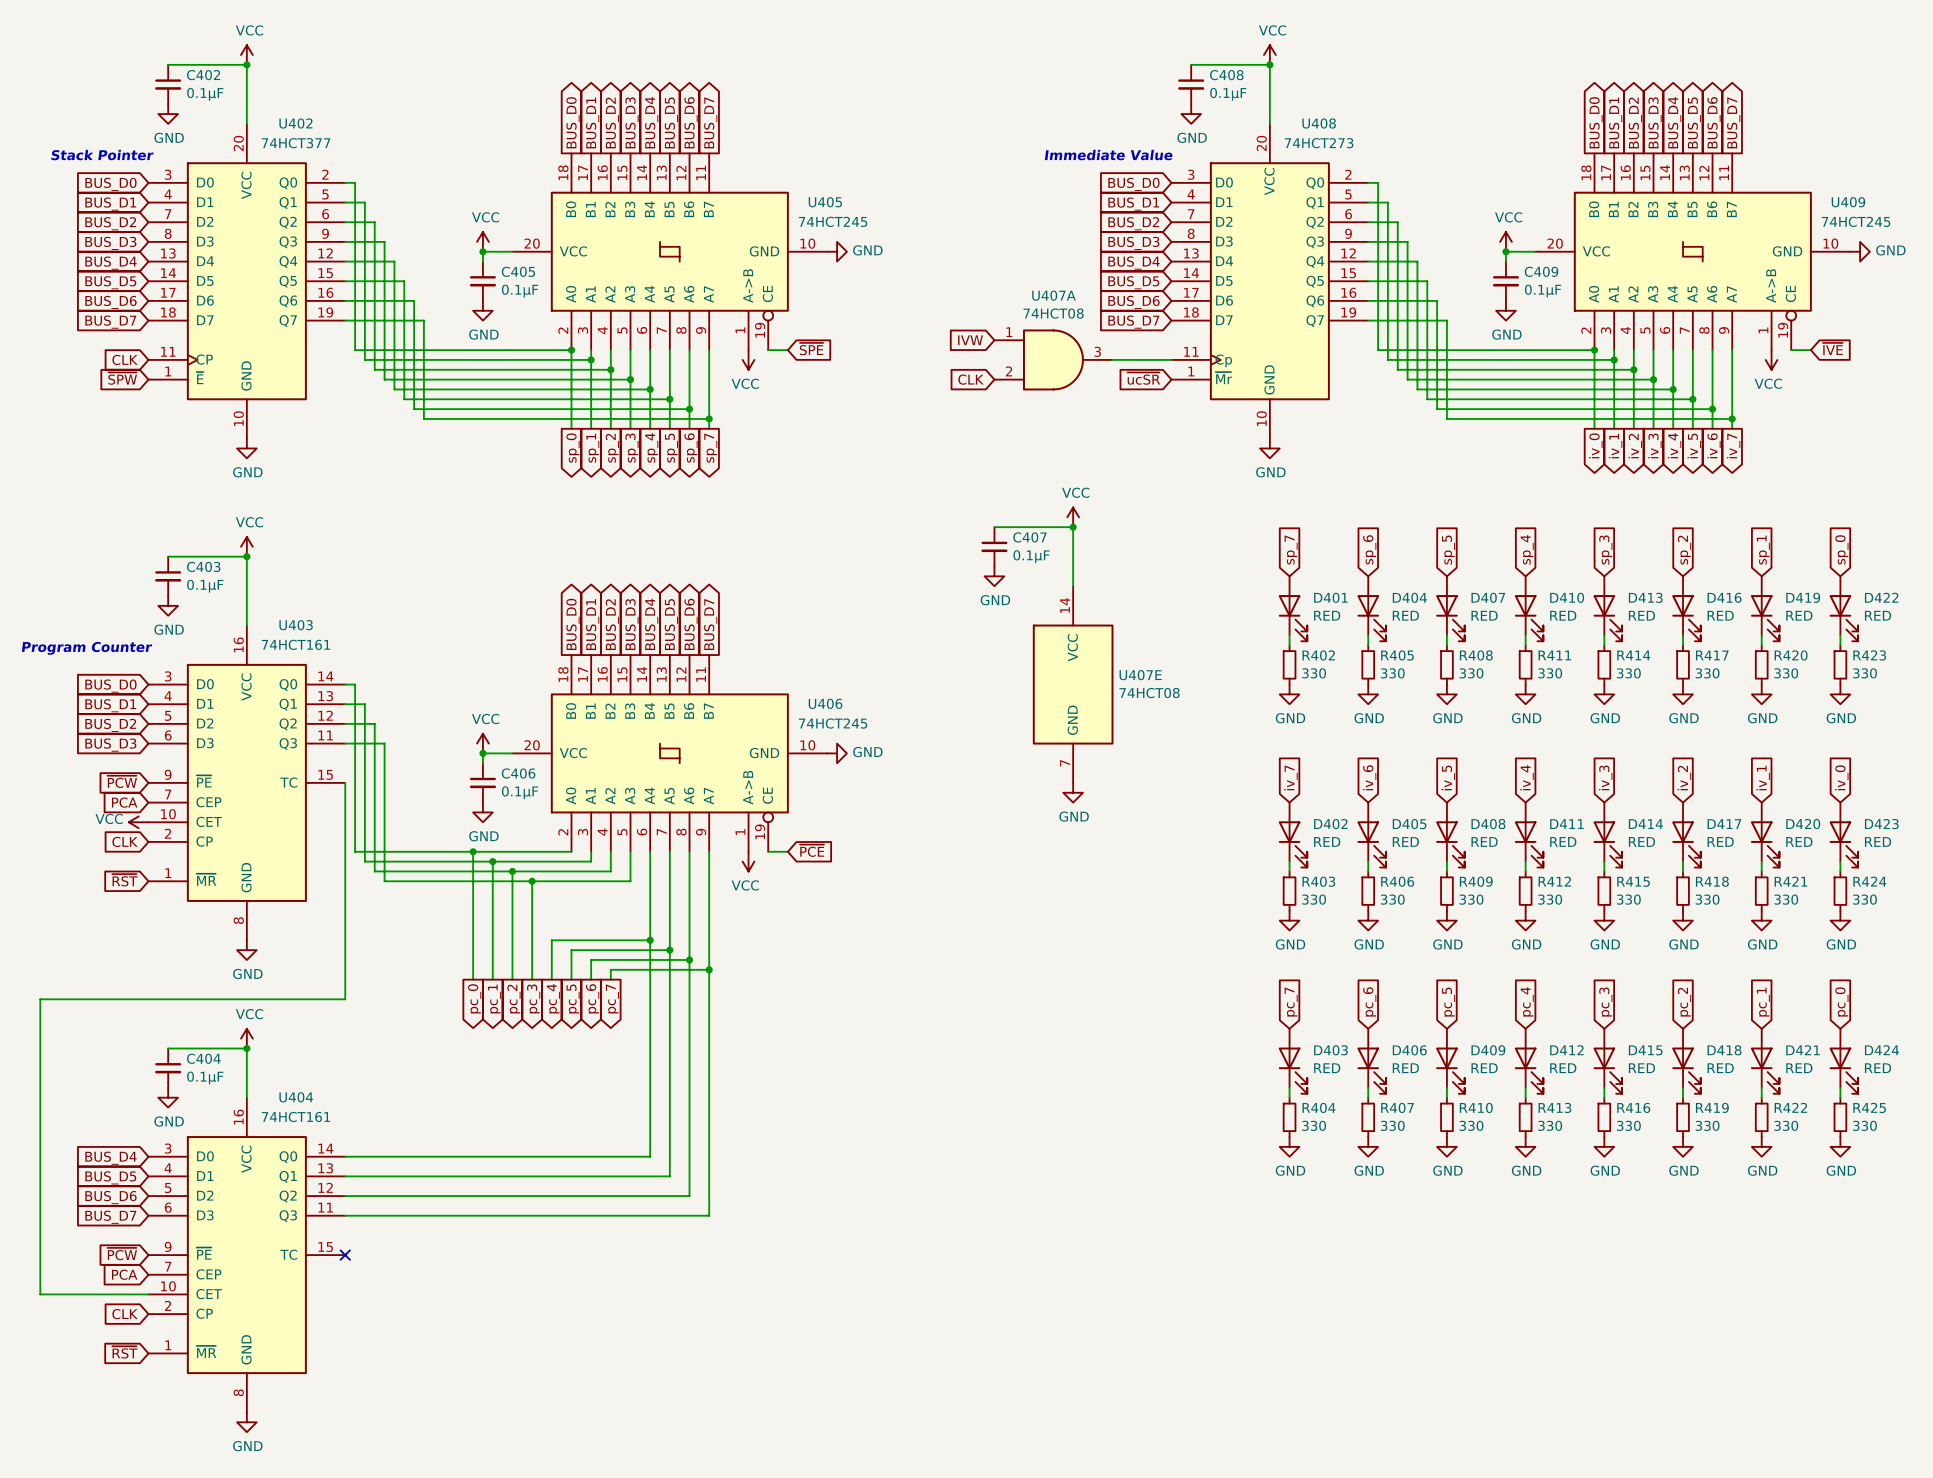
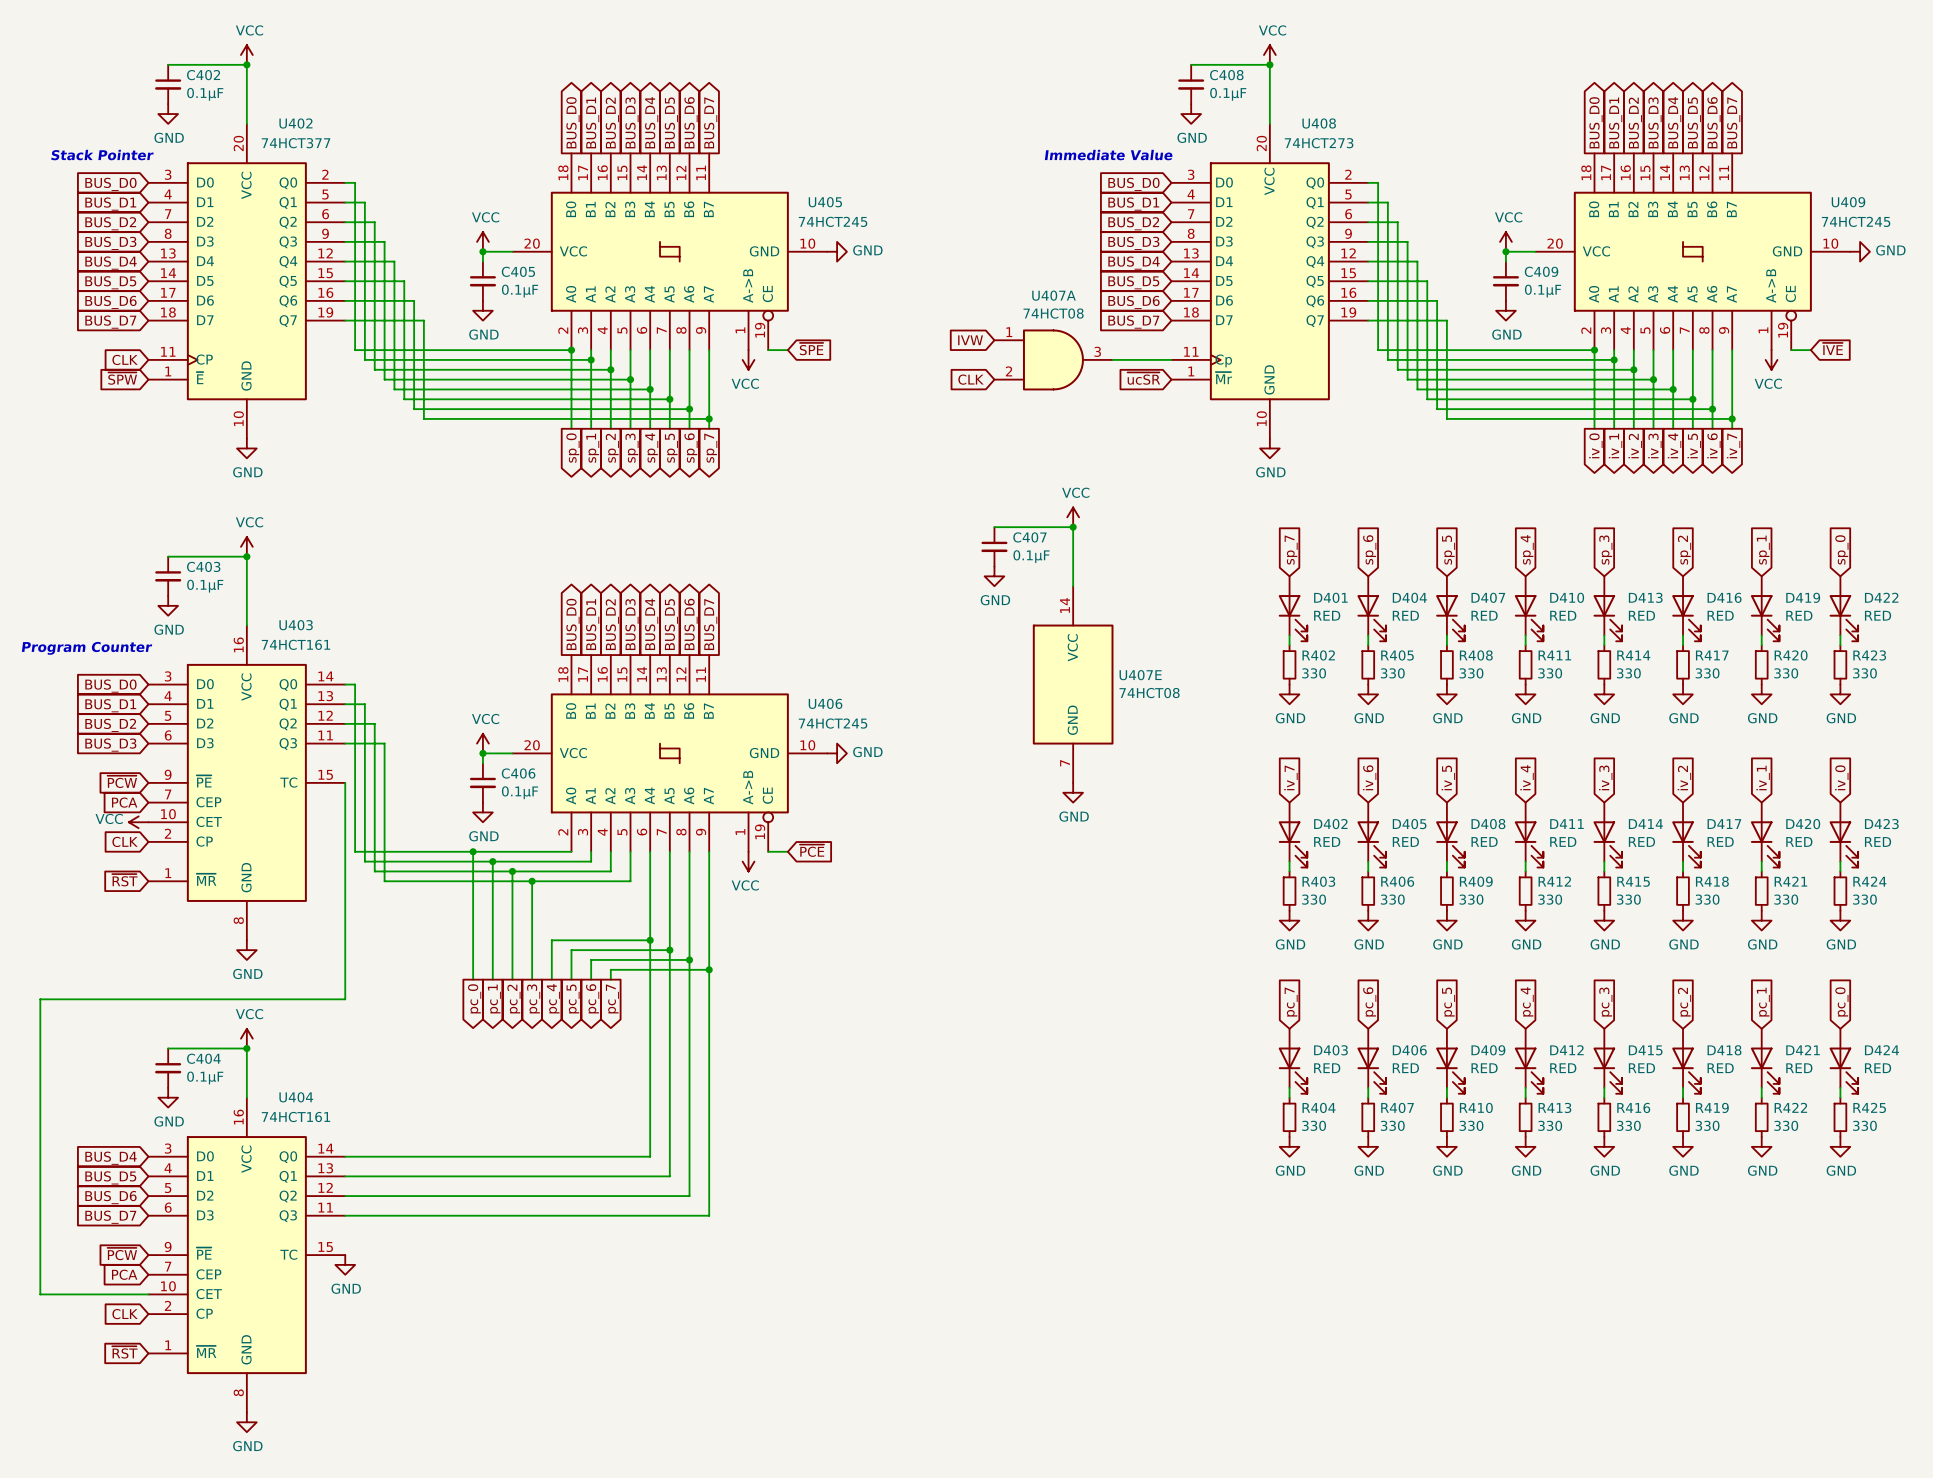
no-connect mark: (345, 1255) -> none
power symbol: none -> GND (345, 1264)

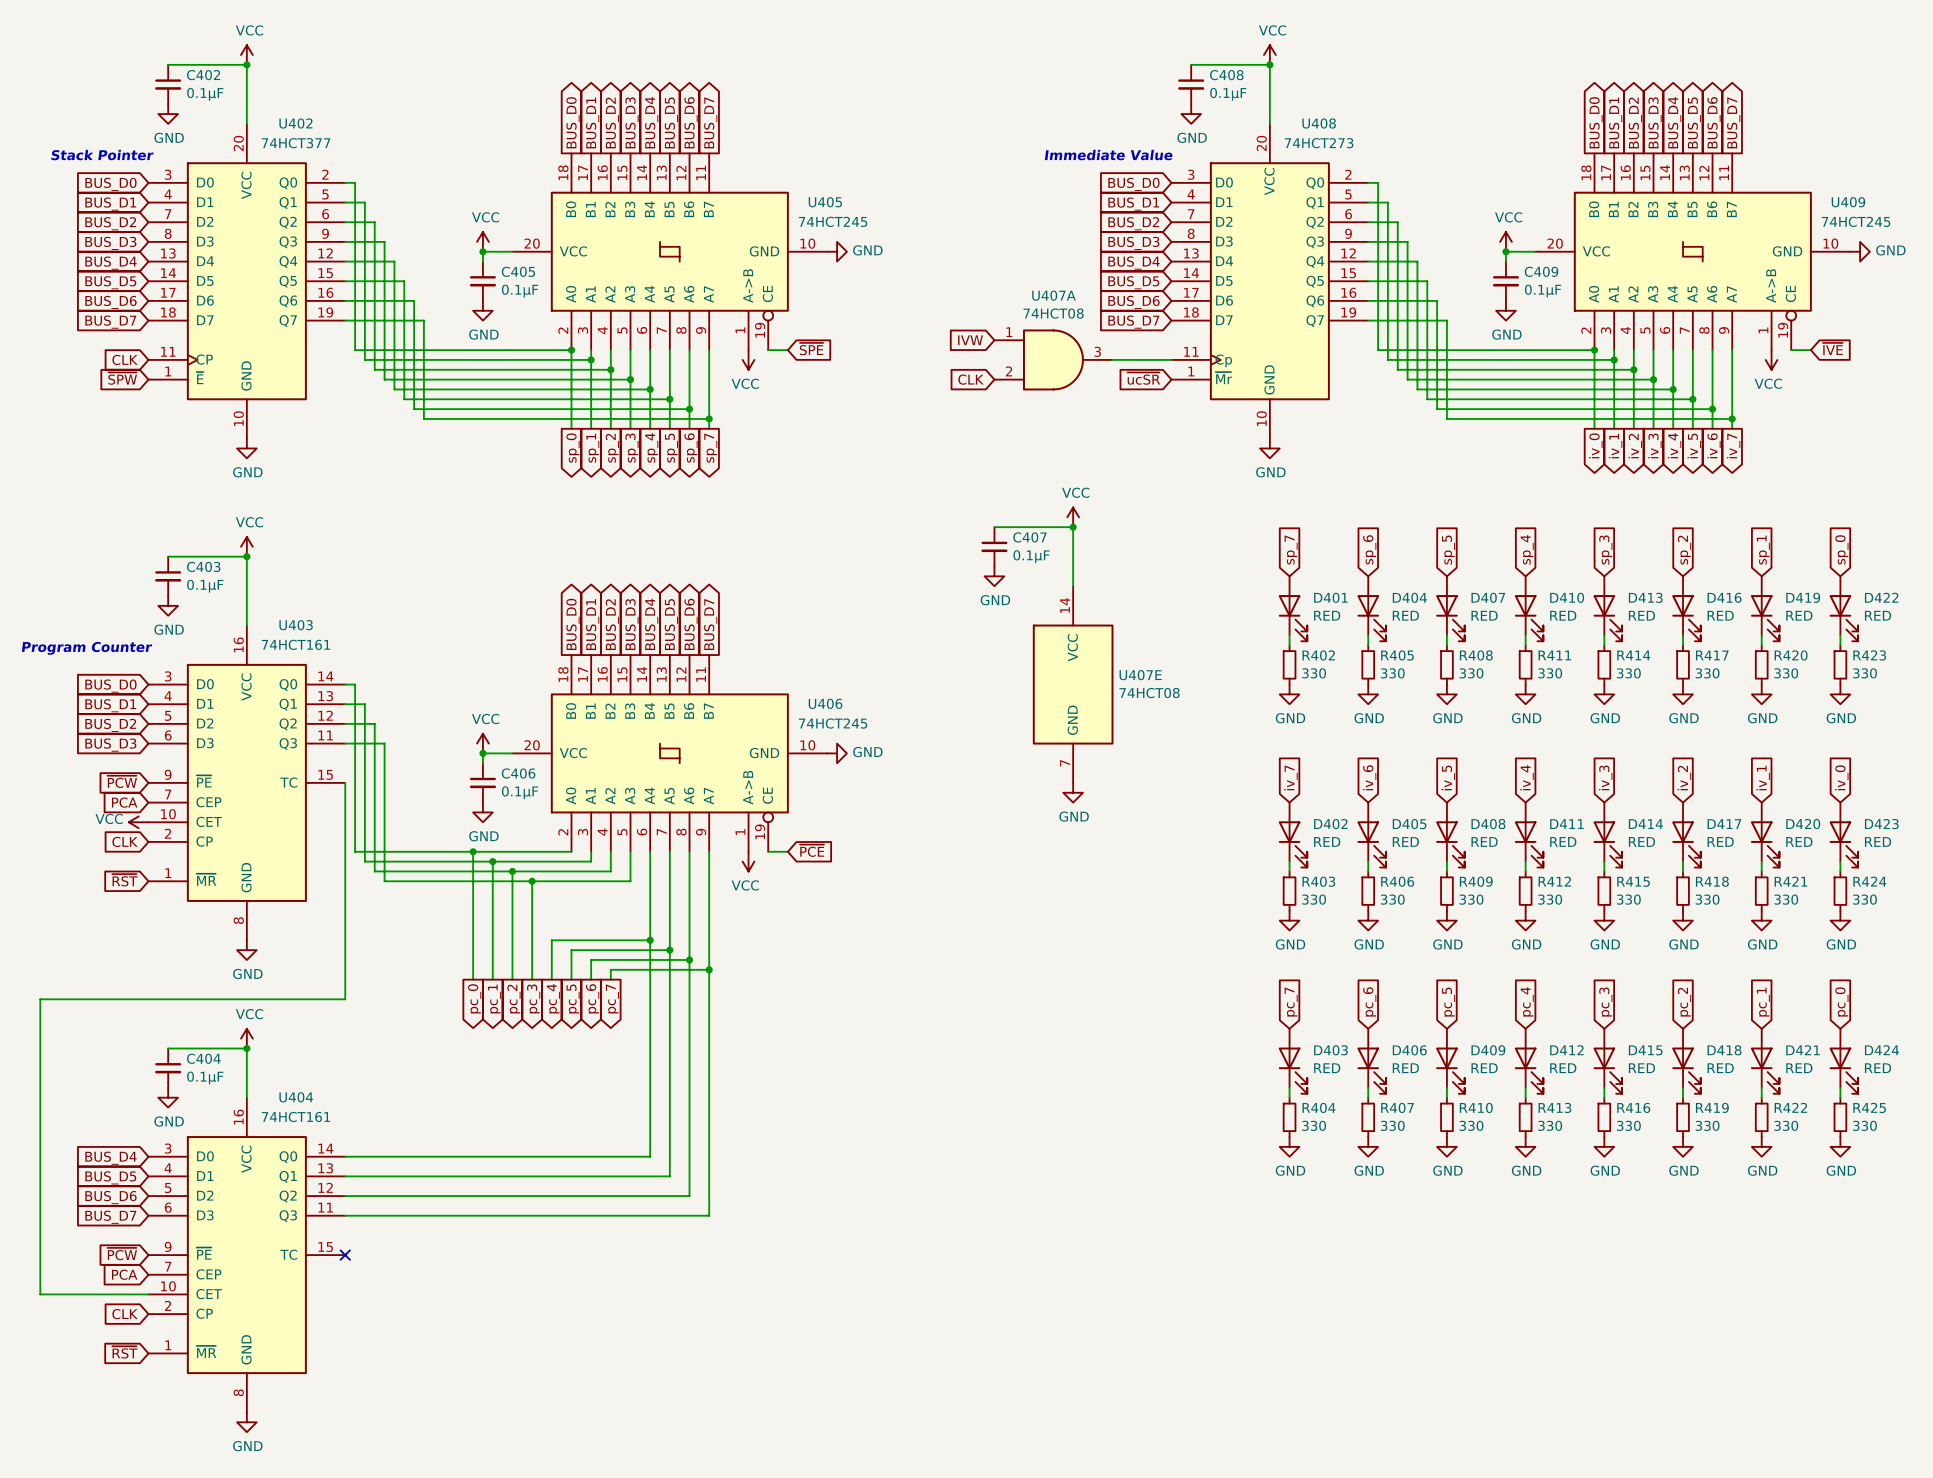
no-connect mark: none -> (345, 1255)
power symbol: GND (345, 1264) -> none

